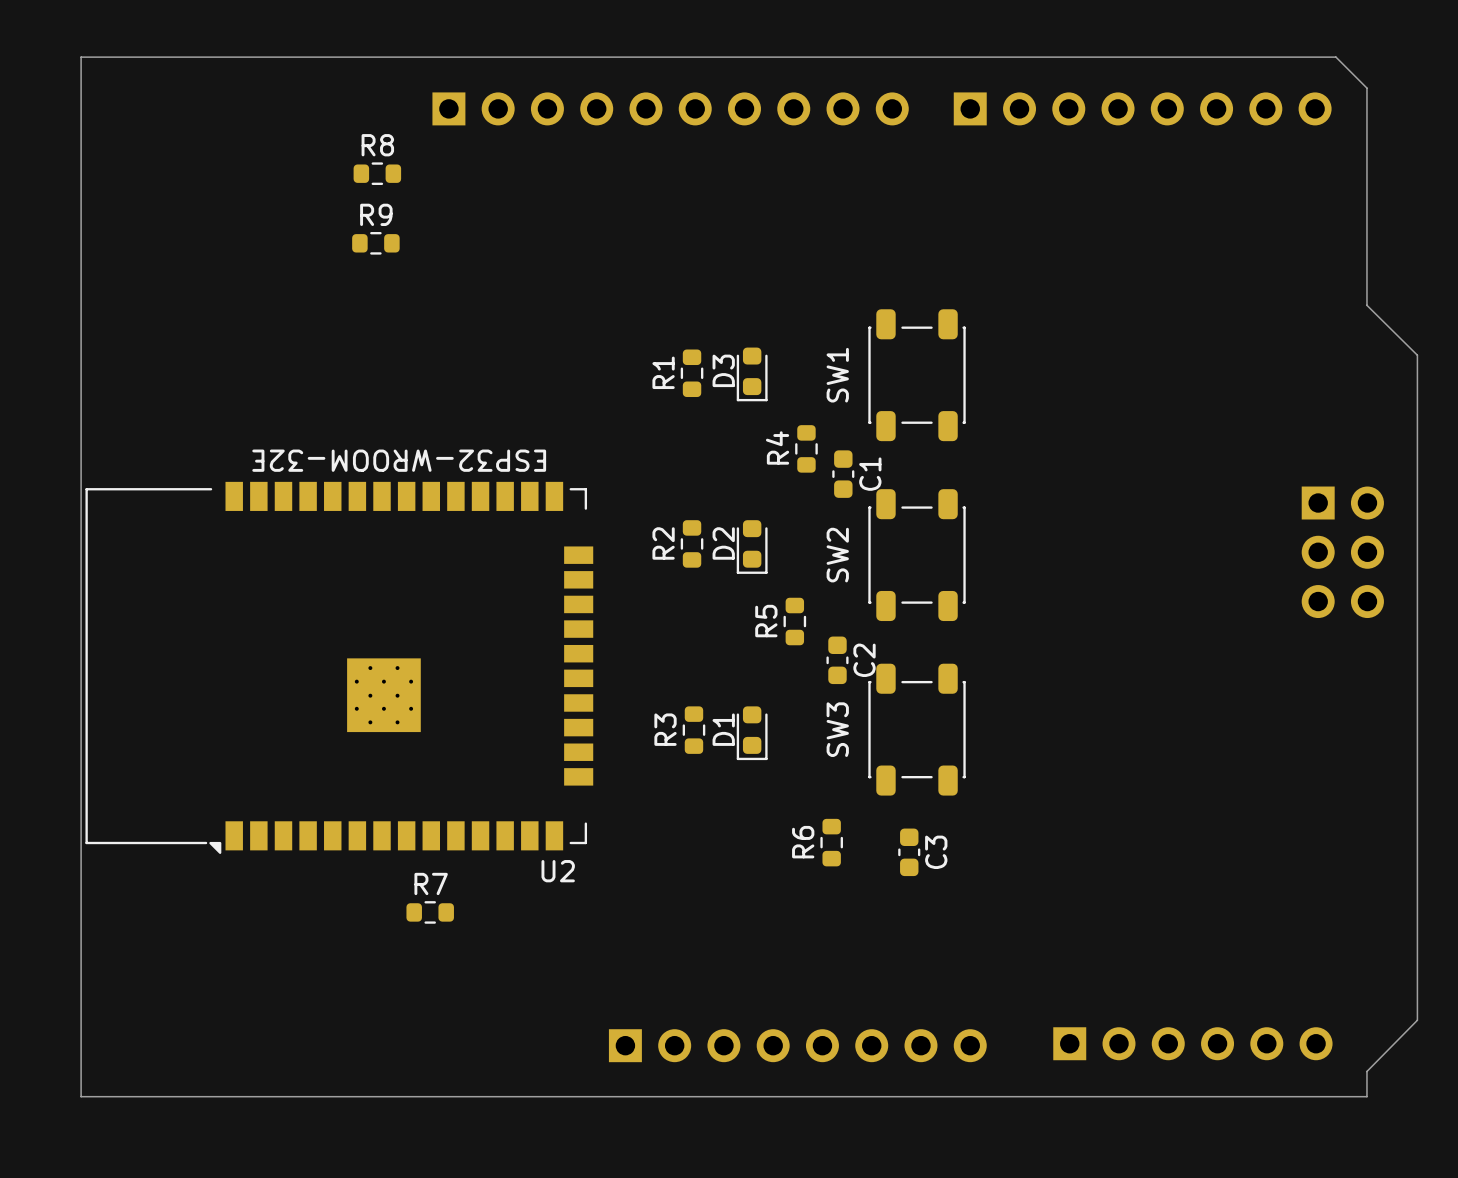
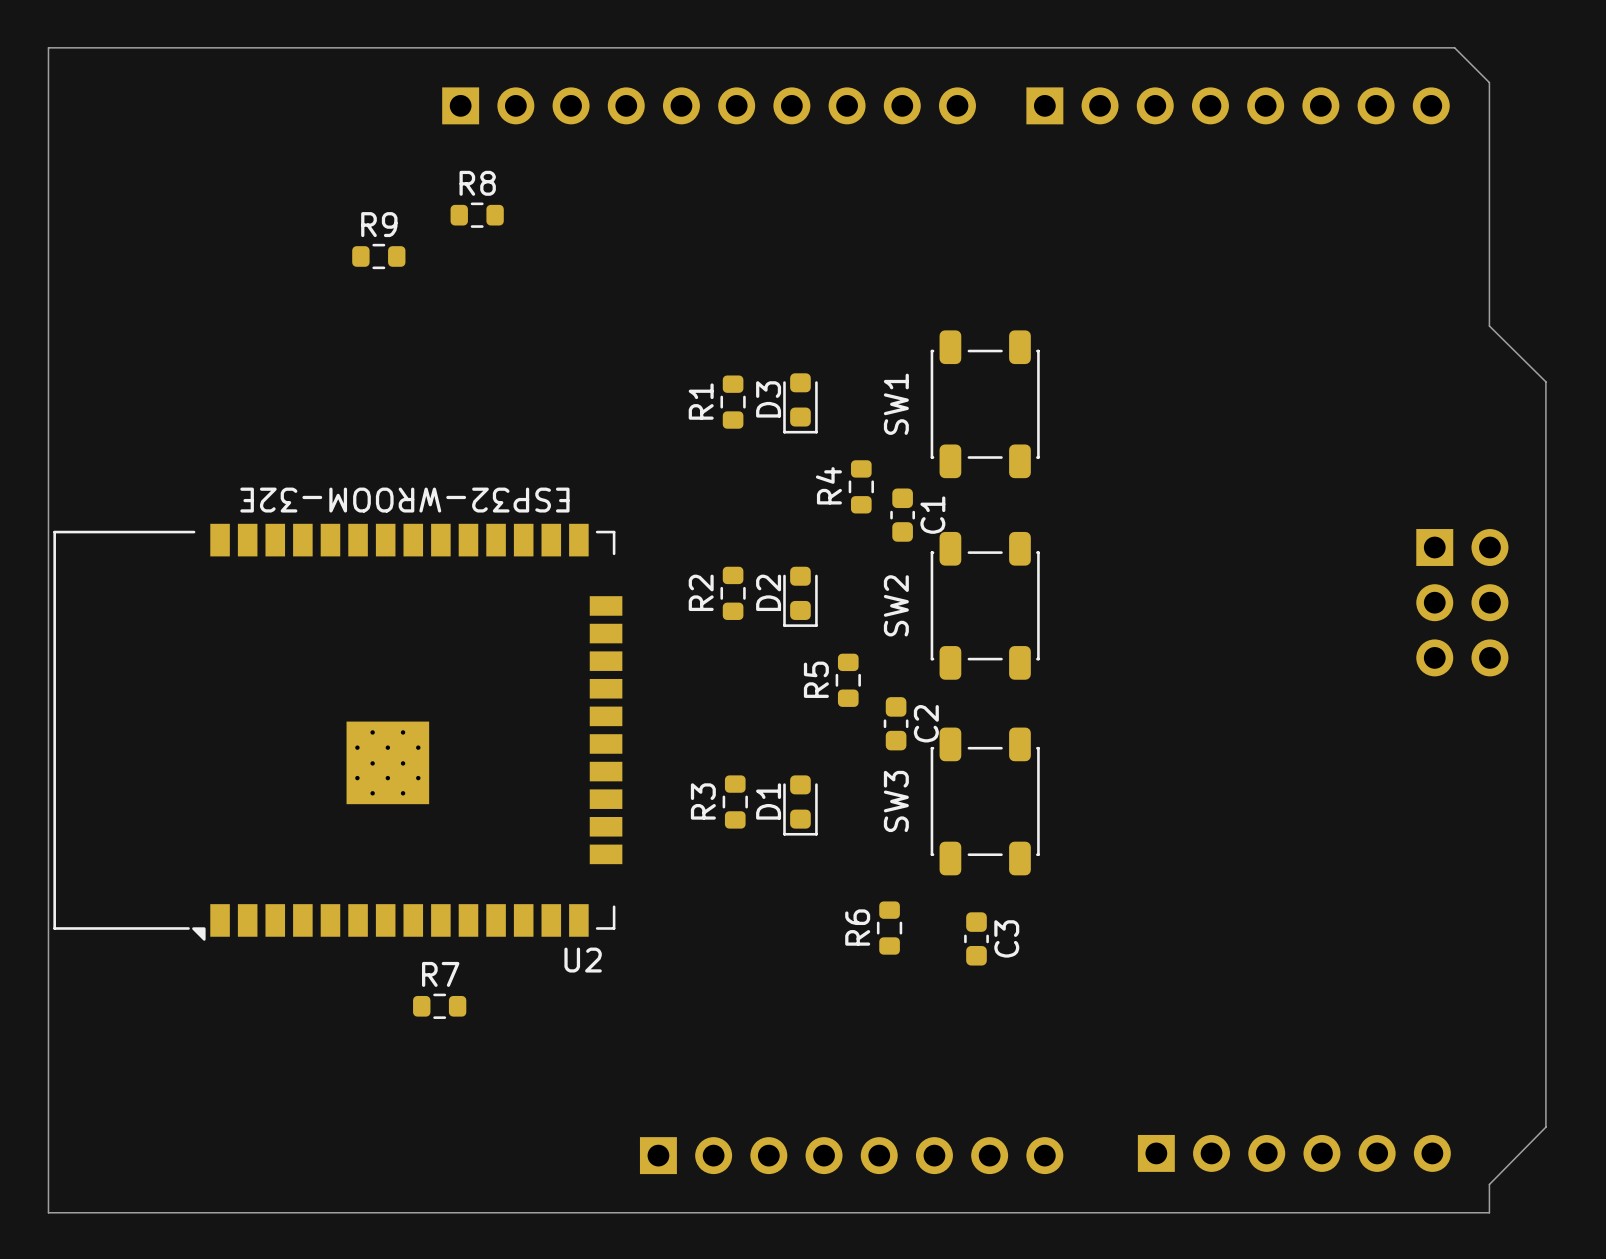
R8 position: (377, 173) -> (477, 215)

